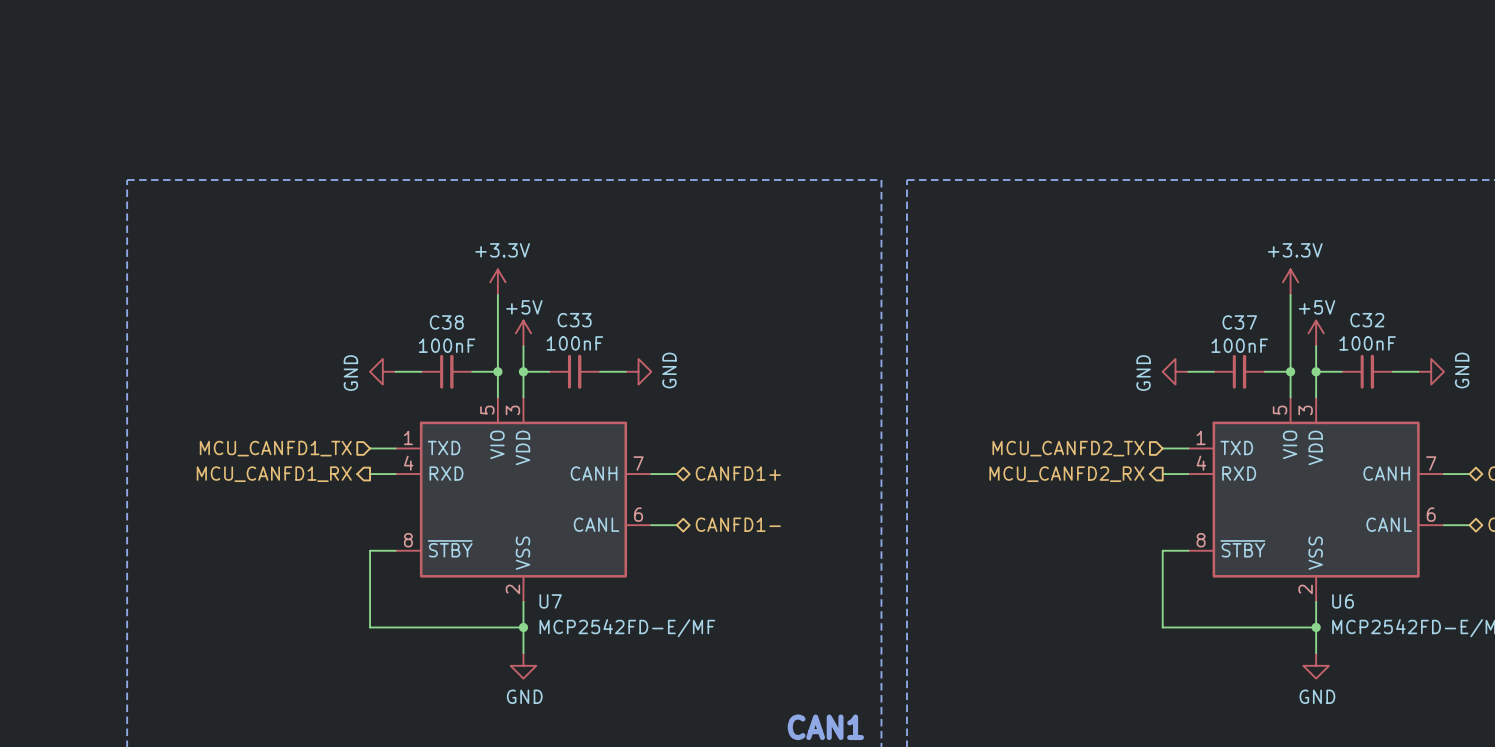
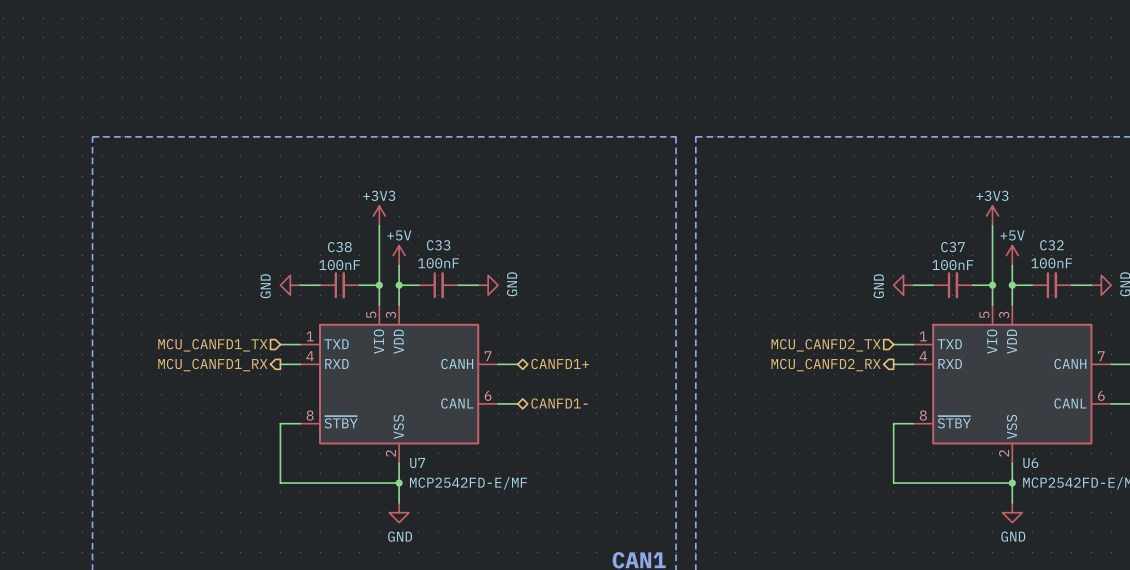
power symbol: +3.3V (497, 282) -> +3V3 (379, 216)
power symbol: +3.3V (1290, 282) -> +3V3 (992, 216)

